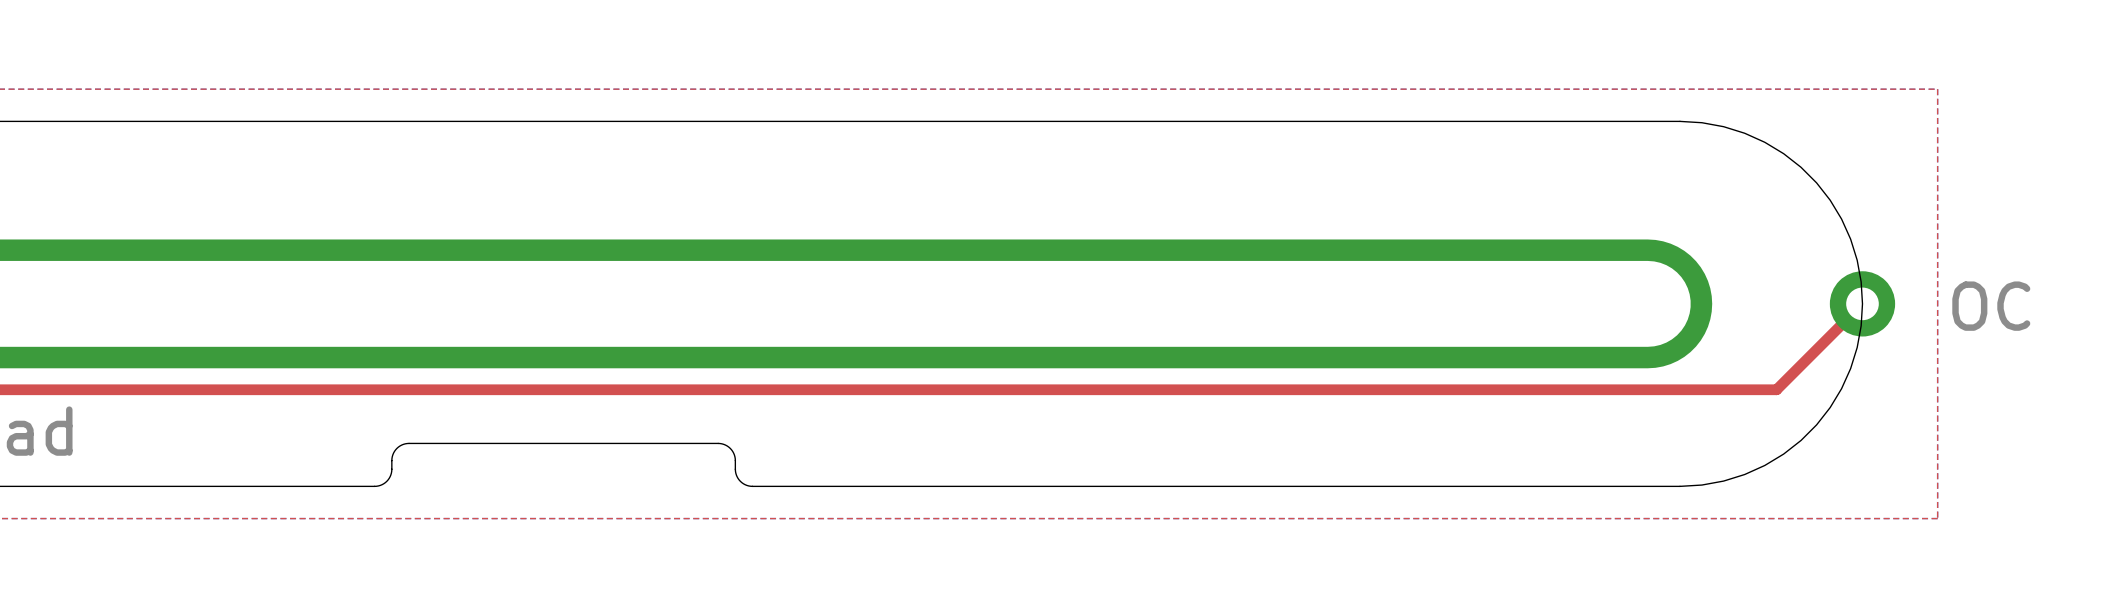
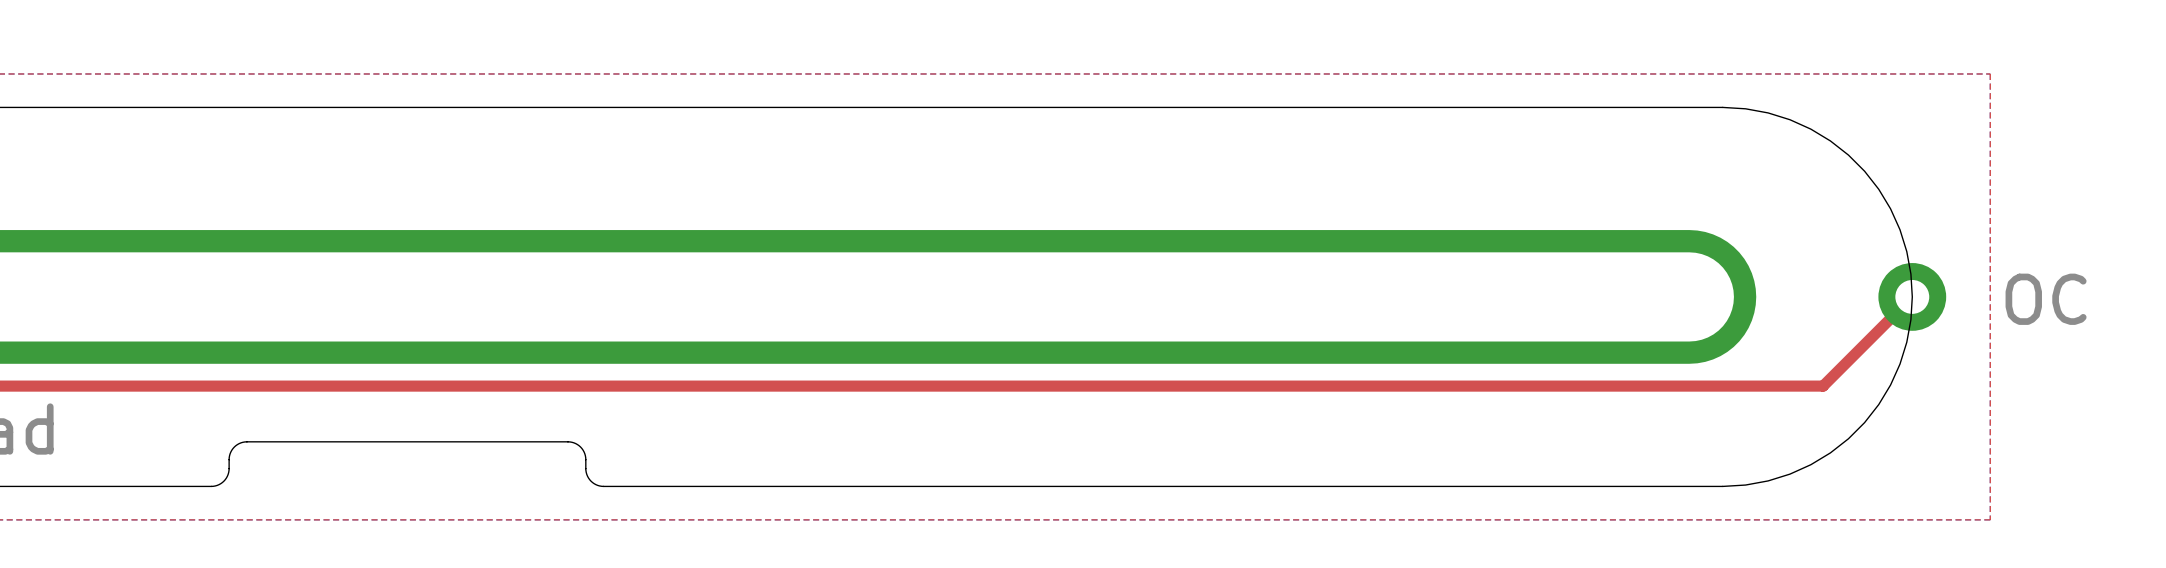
board edge: (409, 443) (401, 445) (395, 449) (392, 456) (390, 476) (385, 482) (378, 485) (224, 486) -> (403, 441) (242, 442) (235, 445) (230, 451) (228, 472) (225, 479) (219, 484) (211, 486)
board edge: (567, 443) (722, 443) (728, 447) (733, 453) (735, 473) (739, 479) (745, 484) (752, 486) -> (567, 441) (575, 443) (581, 448) (585, 455) (587, 476) (592, 482) (599, 485) (759, 486)

